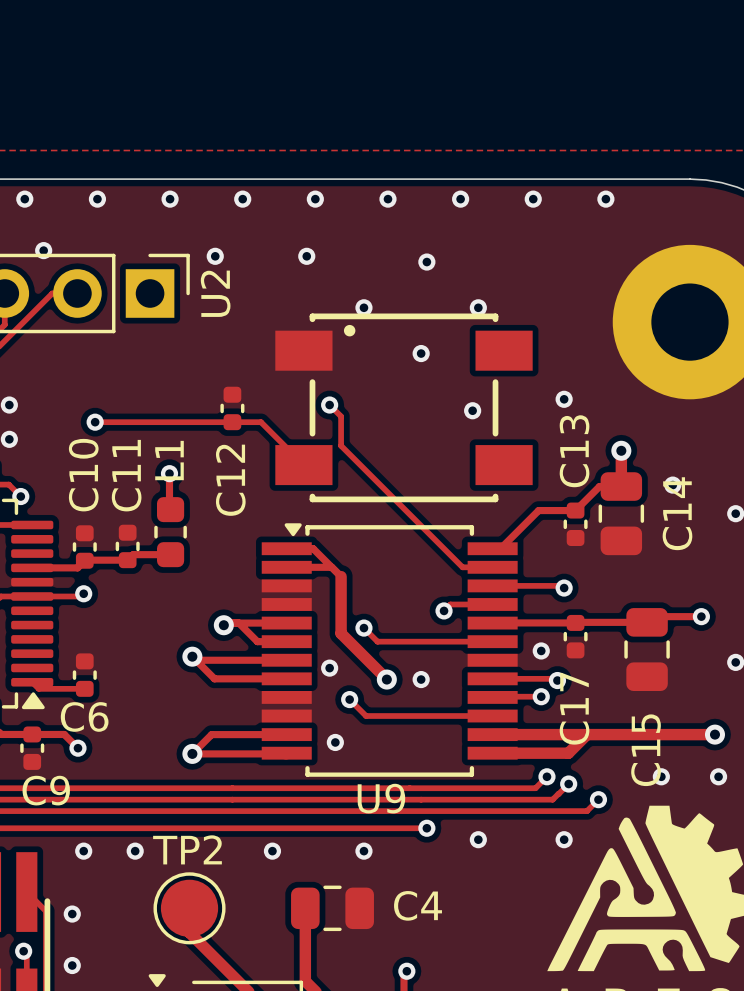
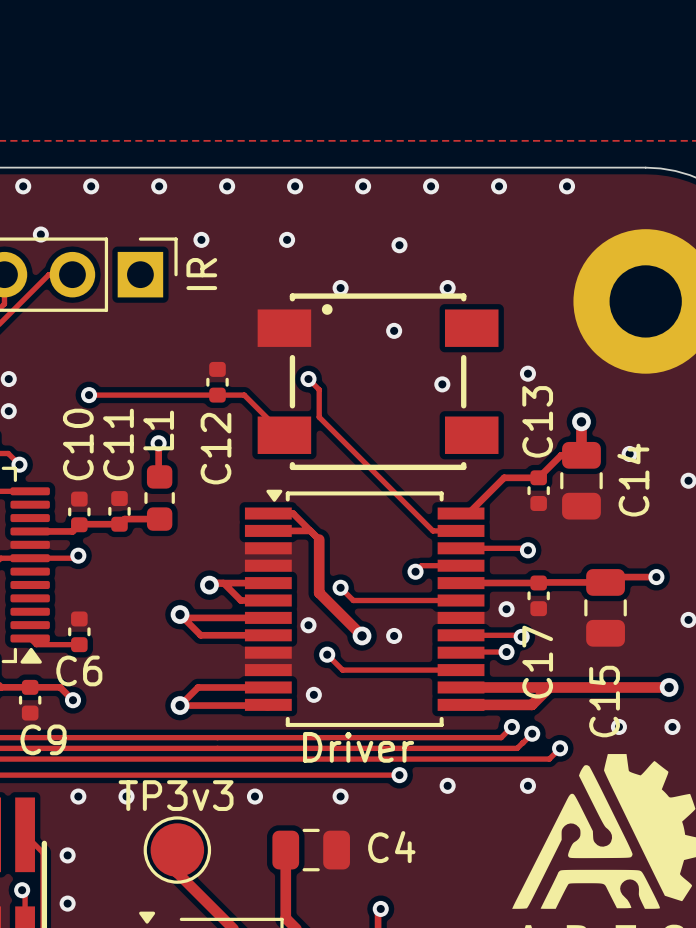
U2 name: U2 (215, 293) -> IR (201, 274)
U9 name: U9 (381, 798) -> Driver (358, 747)
TP2 name: TP2 (187, 849) -> TP3v3 (176, 795)

